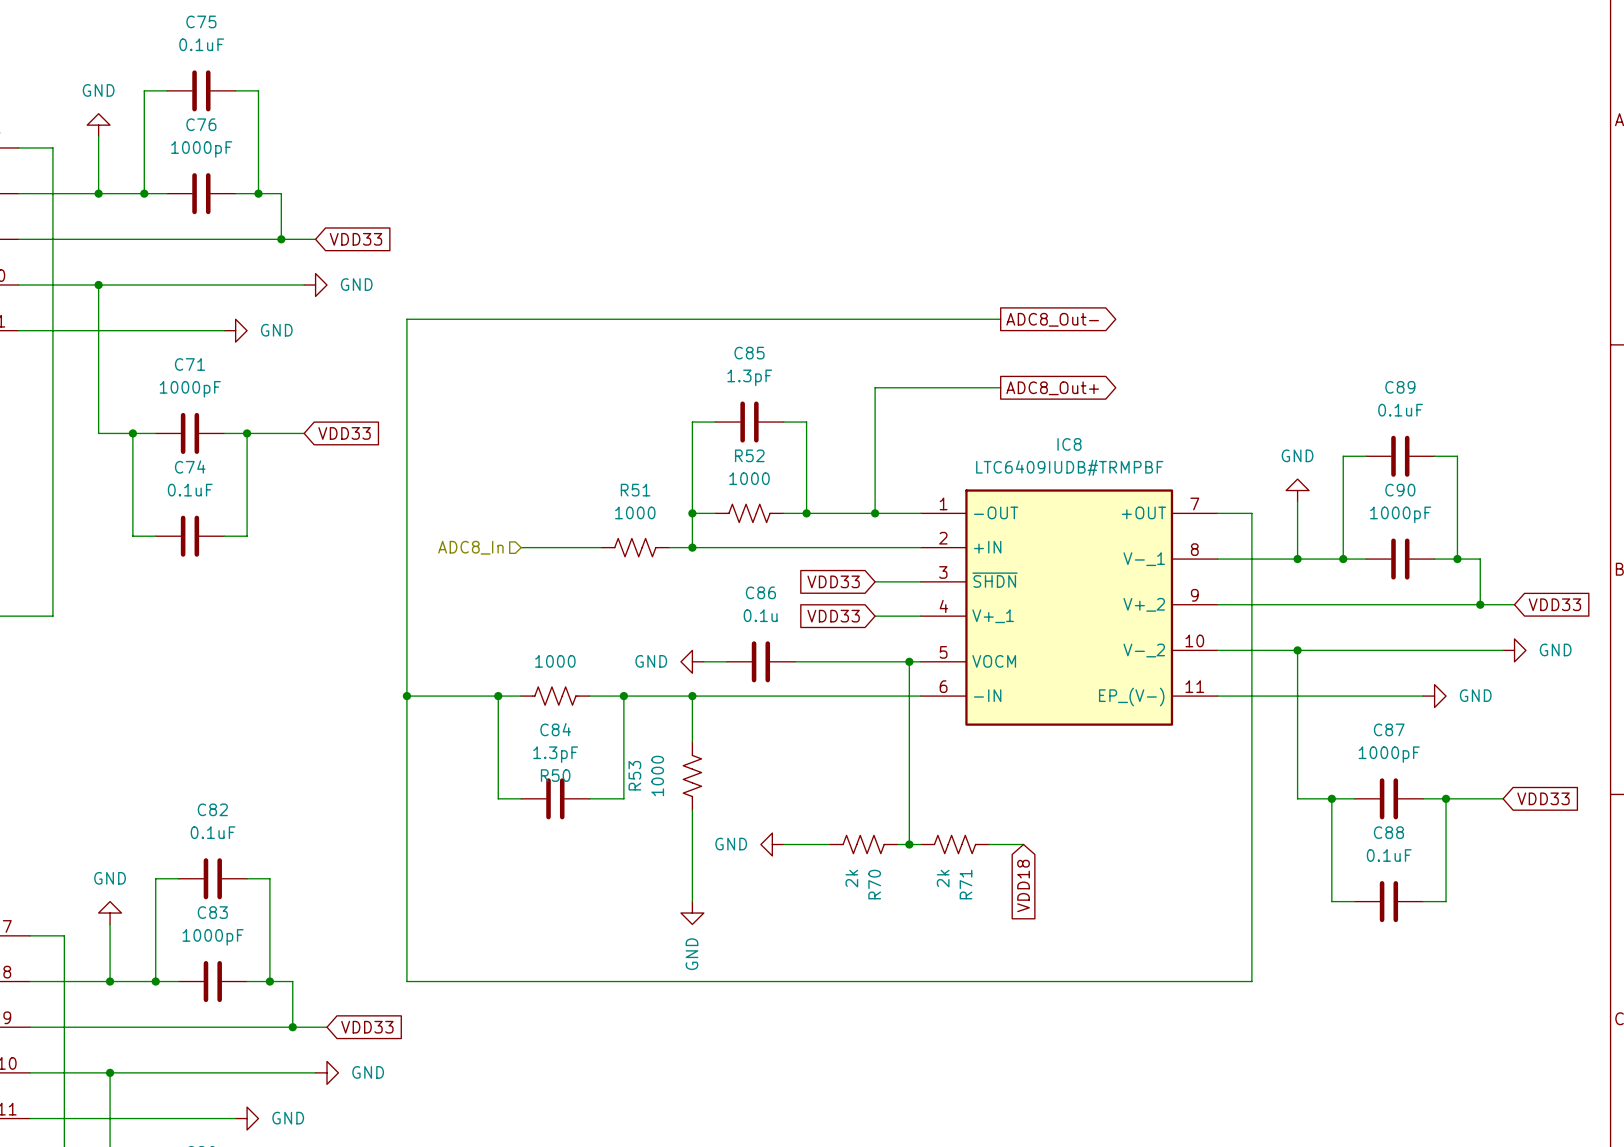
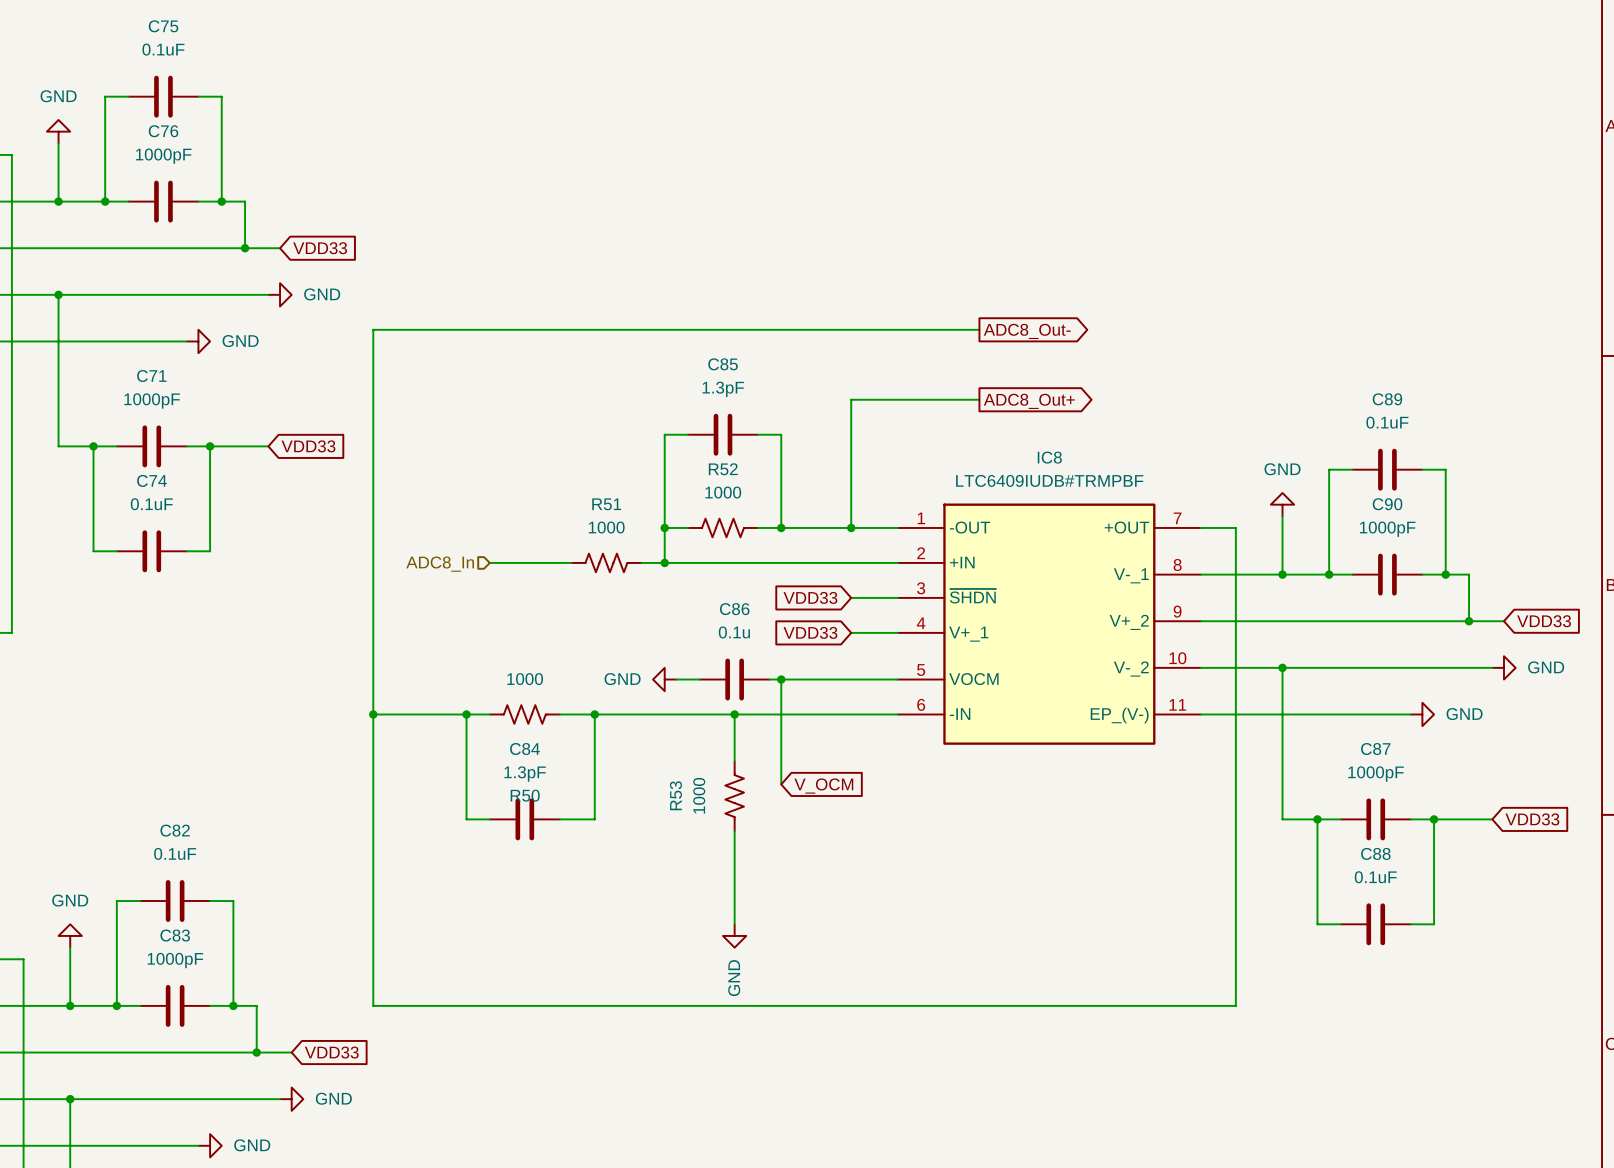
wire: none -> (781, 679) (781, 784)
junction: none -> (781, 679)
wire: (909, 661) (909, 844) -> none
junction: (909, 661) -> none
wire: (692, 696) (692, 741) -> (734, 714) (734, 761)
junction: (692, 696) -> none
junction: none -> (734, 714)
global label: none -> V_OCM (823, 786)
R53 position: (692, 776) -> (734, 796)
wire: (692, 810) (692, 901) -> (734, 831) (734, 924)
power symbol: GND (772, 844) -> none
wire: (783, 844) (829, 844) -> none
R70: 2k (863, 844) -> none
wire: (897, 844) (920, 844) -> none
junction: (909, 844) -> none
R71: 2k (955, 844) -> none
wire: (989, 844) (1023, 844) -> none
global label: VDD18 (1023, 885) -> none
power symbol: GND (692, 913) -> none
power symbol: none -> GND (734, 935)

